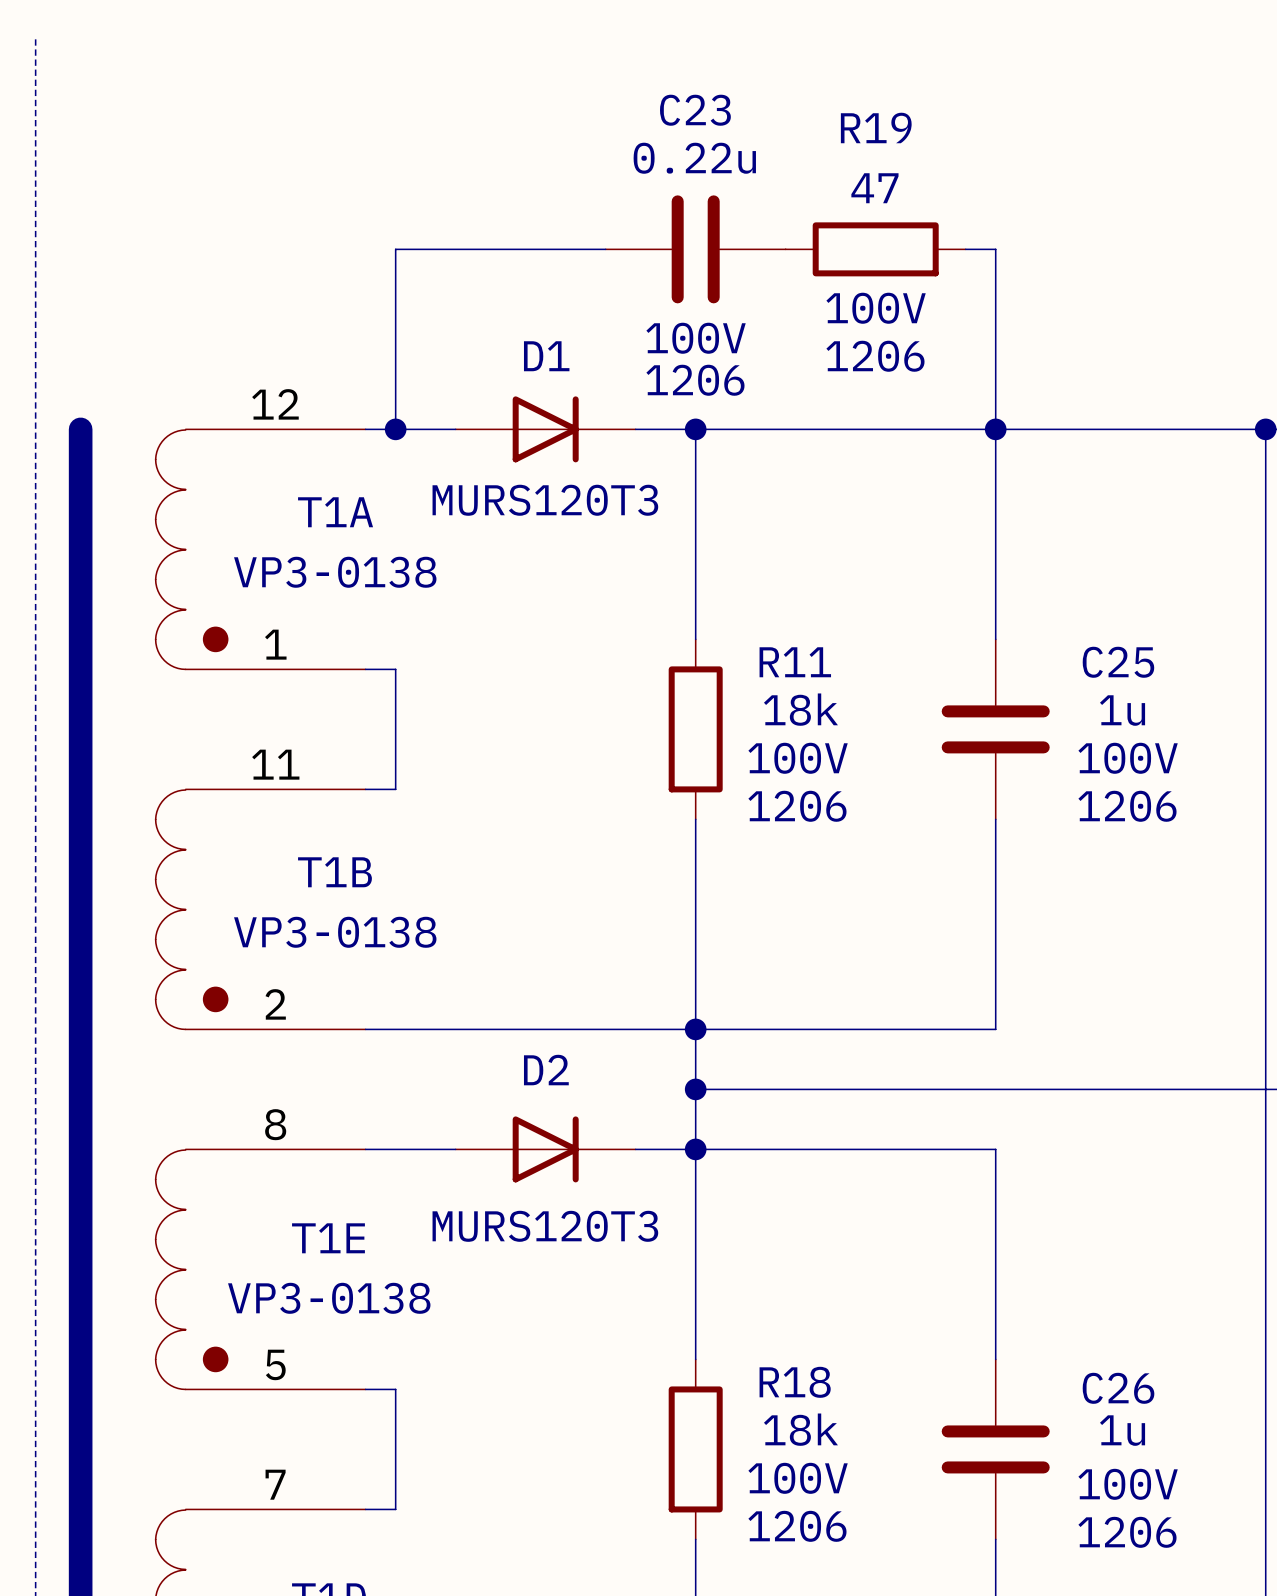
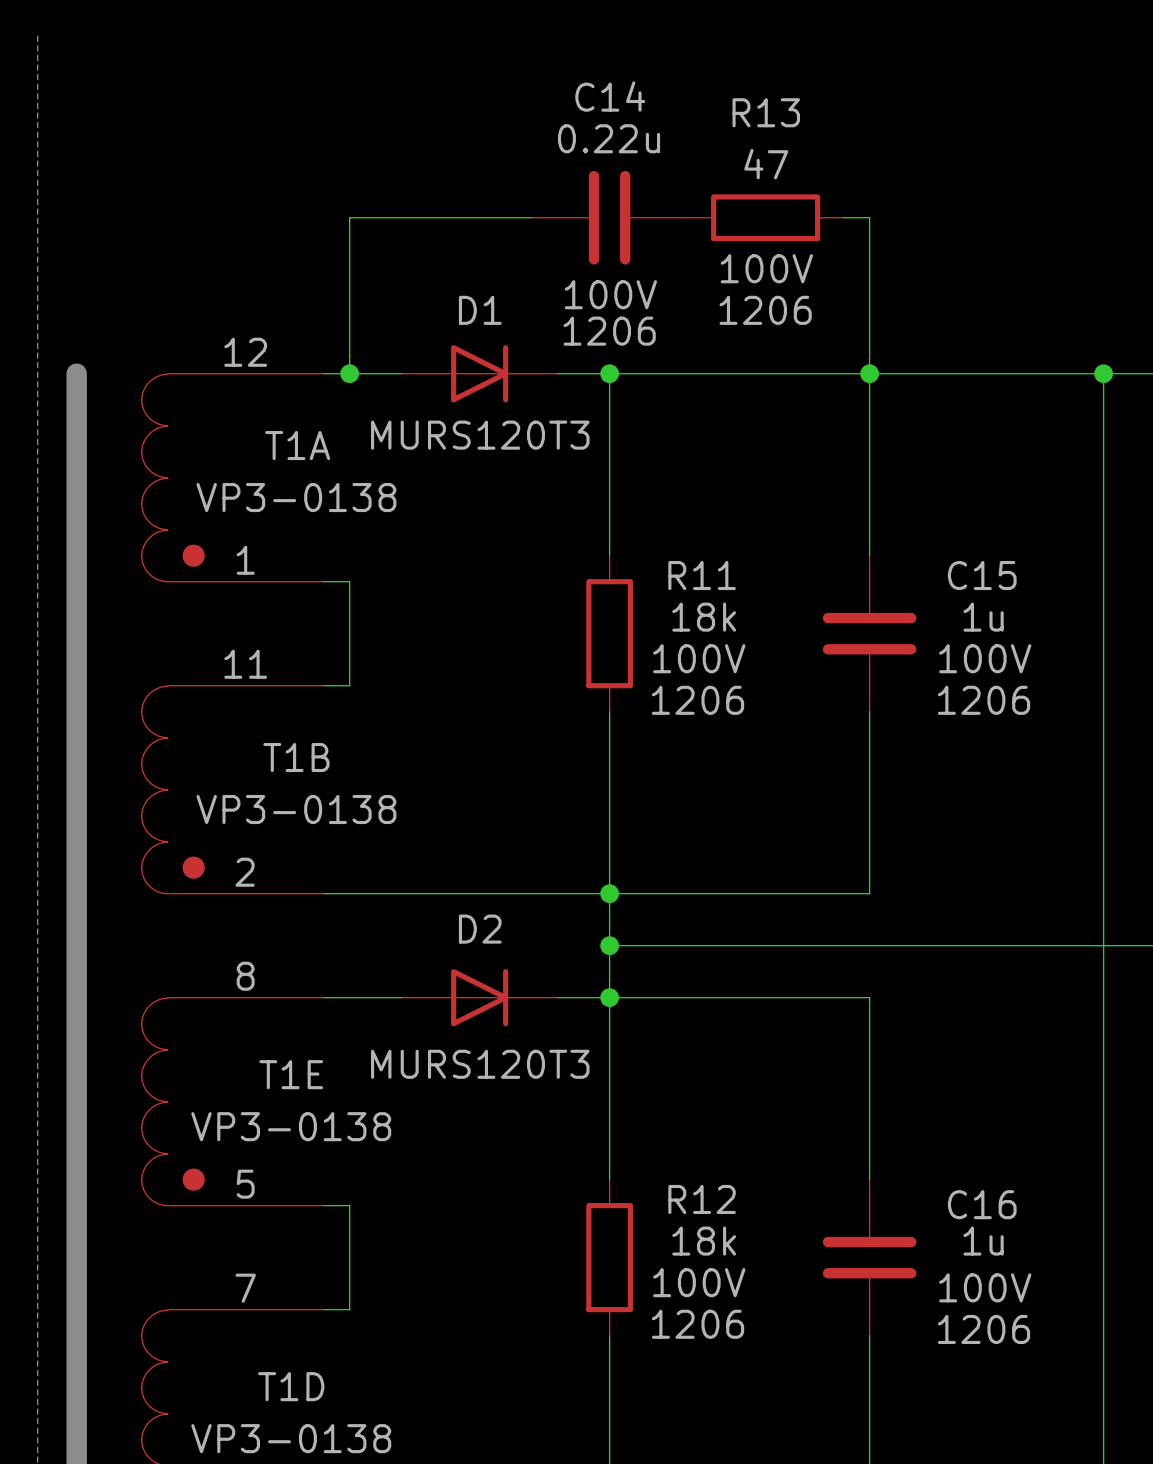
C23 name: C23 (695, 110) -> C14 (610, 96)
R19 name: R19 (876, 127) -> R13 (766, 112)
C25 name: C25 (1118, 662) -> C15 (982, 575)
R18 name: R18 (795, 1382) -> R12 (702, 1199)
C26 name: C26 (1118, 1388) -> C16 (982, 1204)

